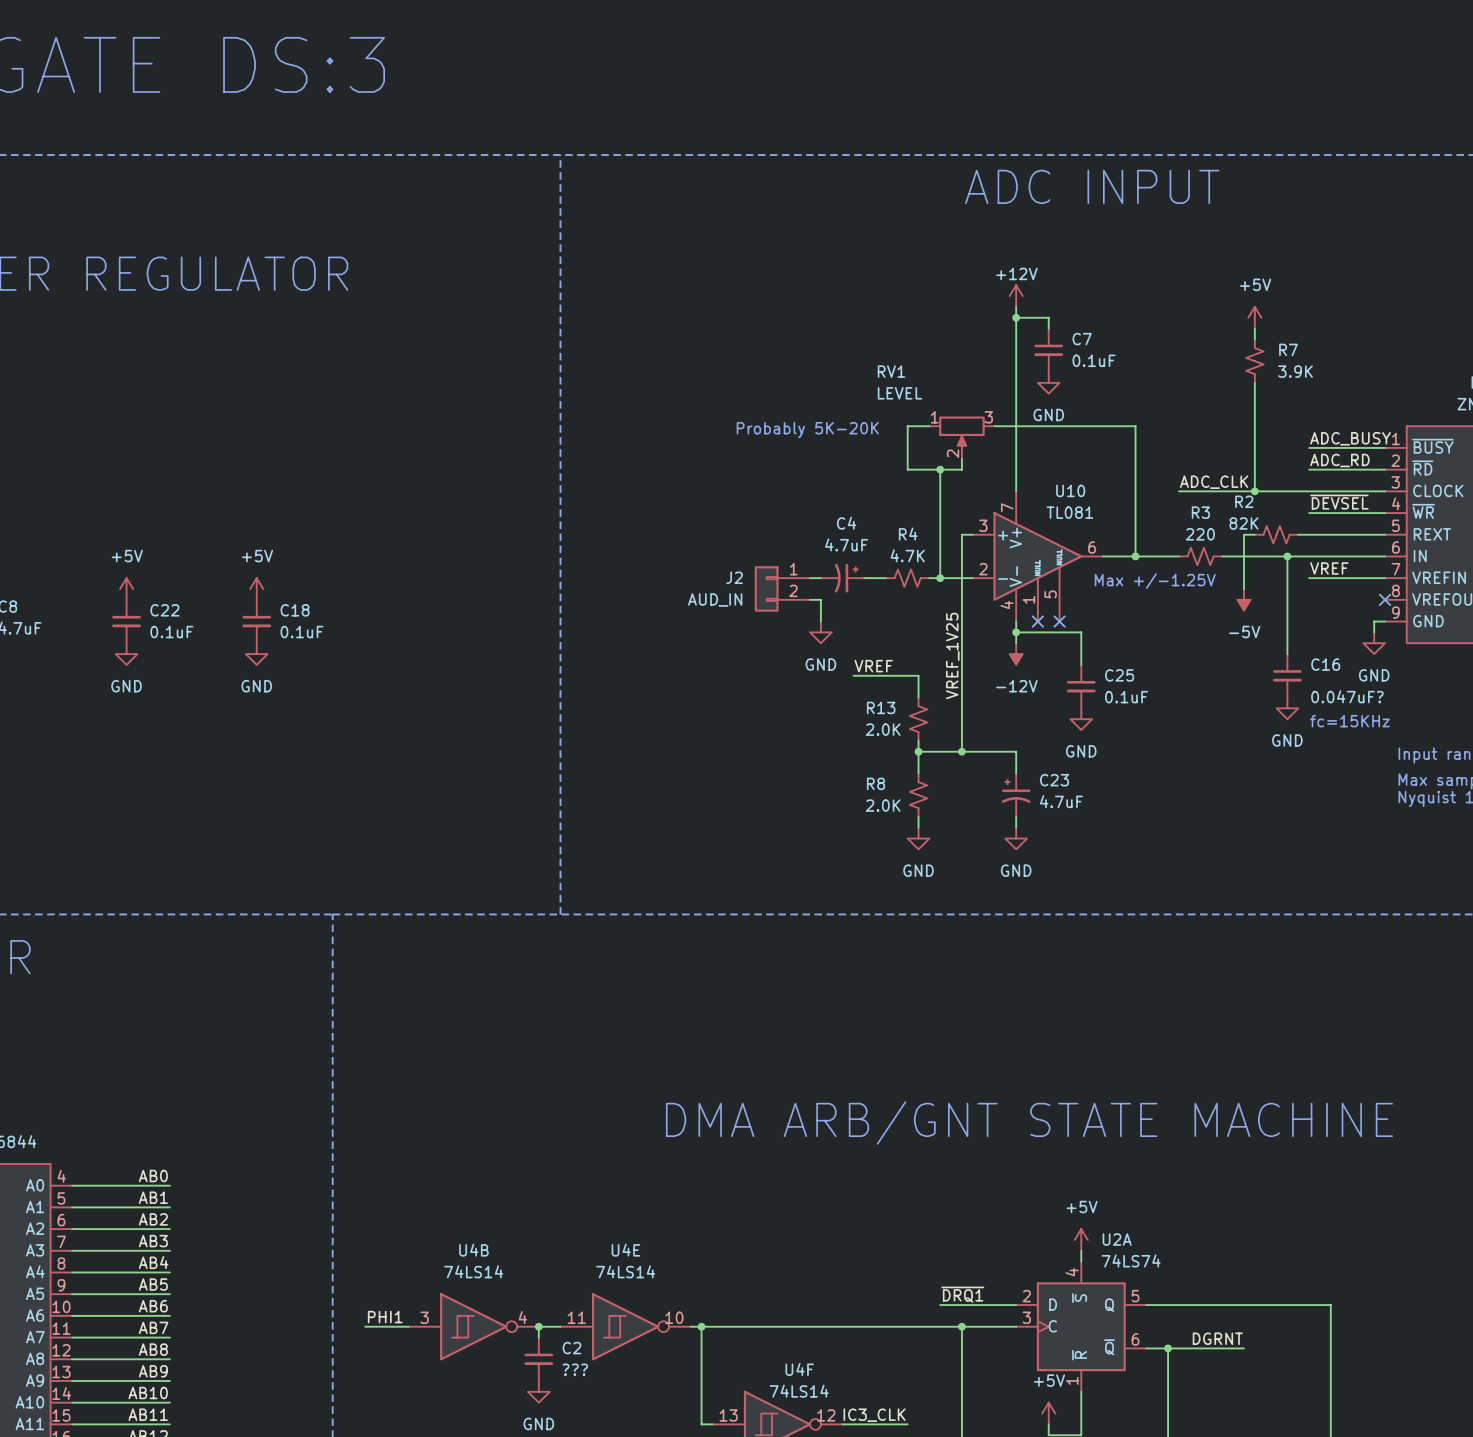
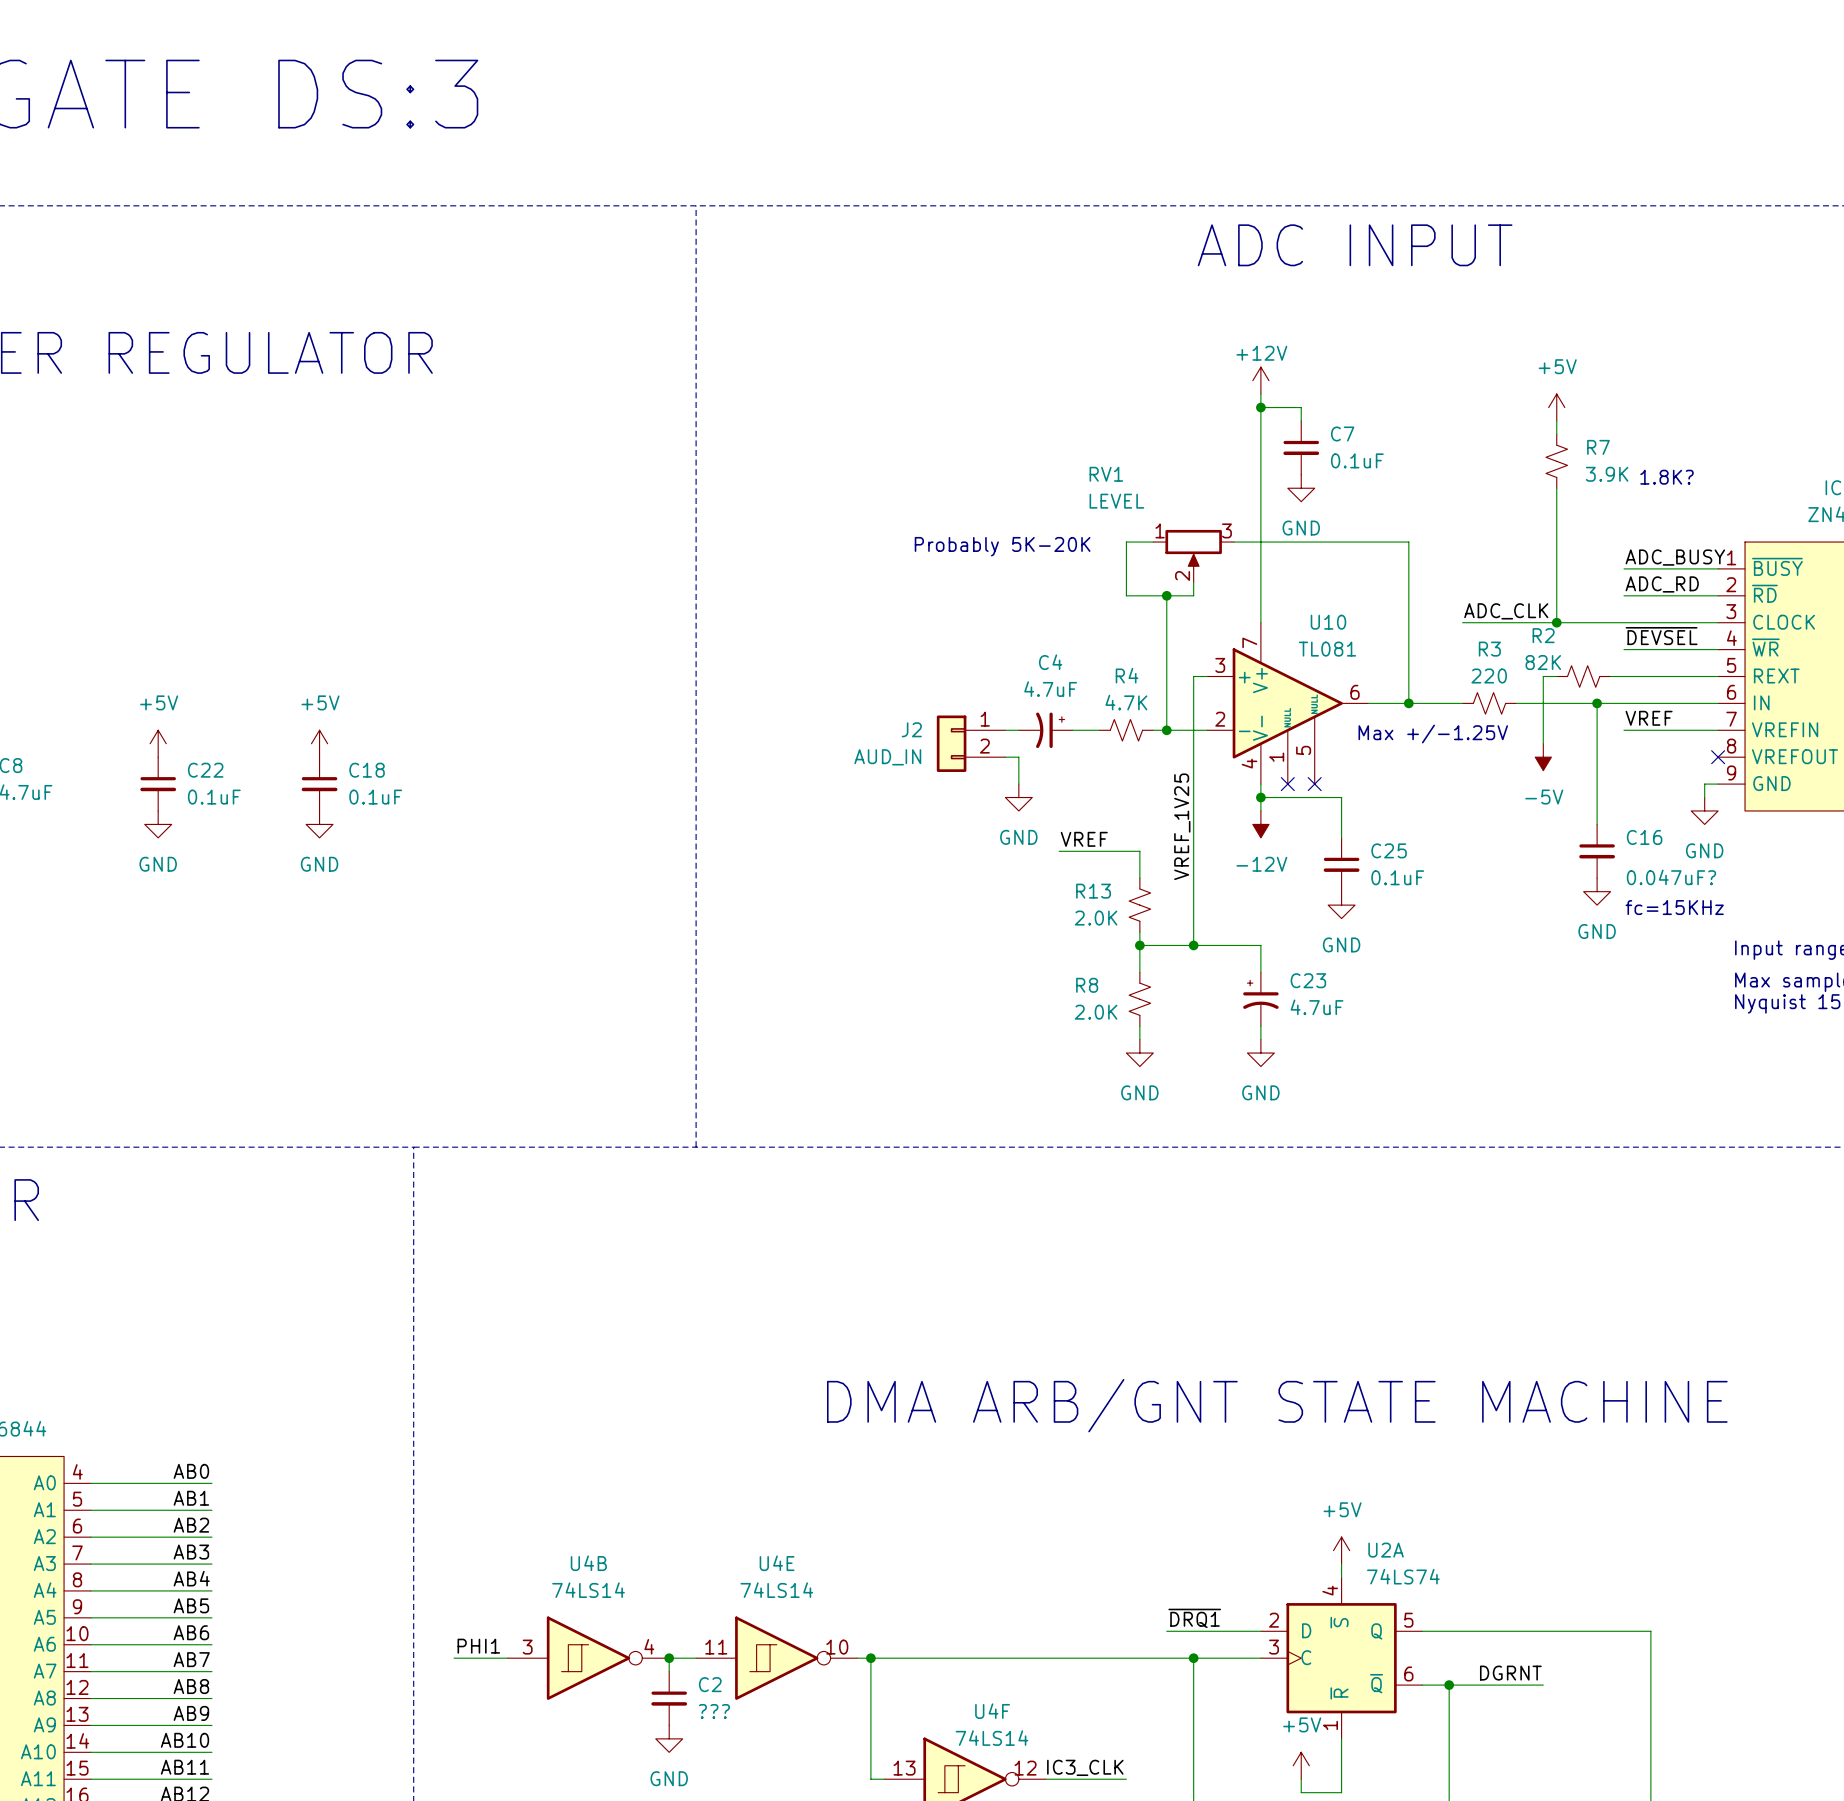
text: none -> 1.8K? (1667, 477)

